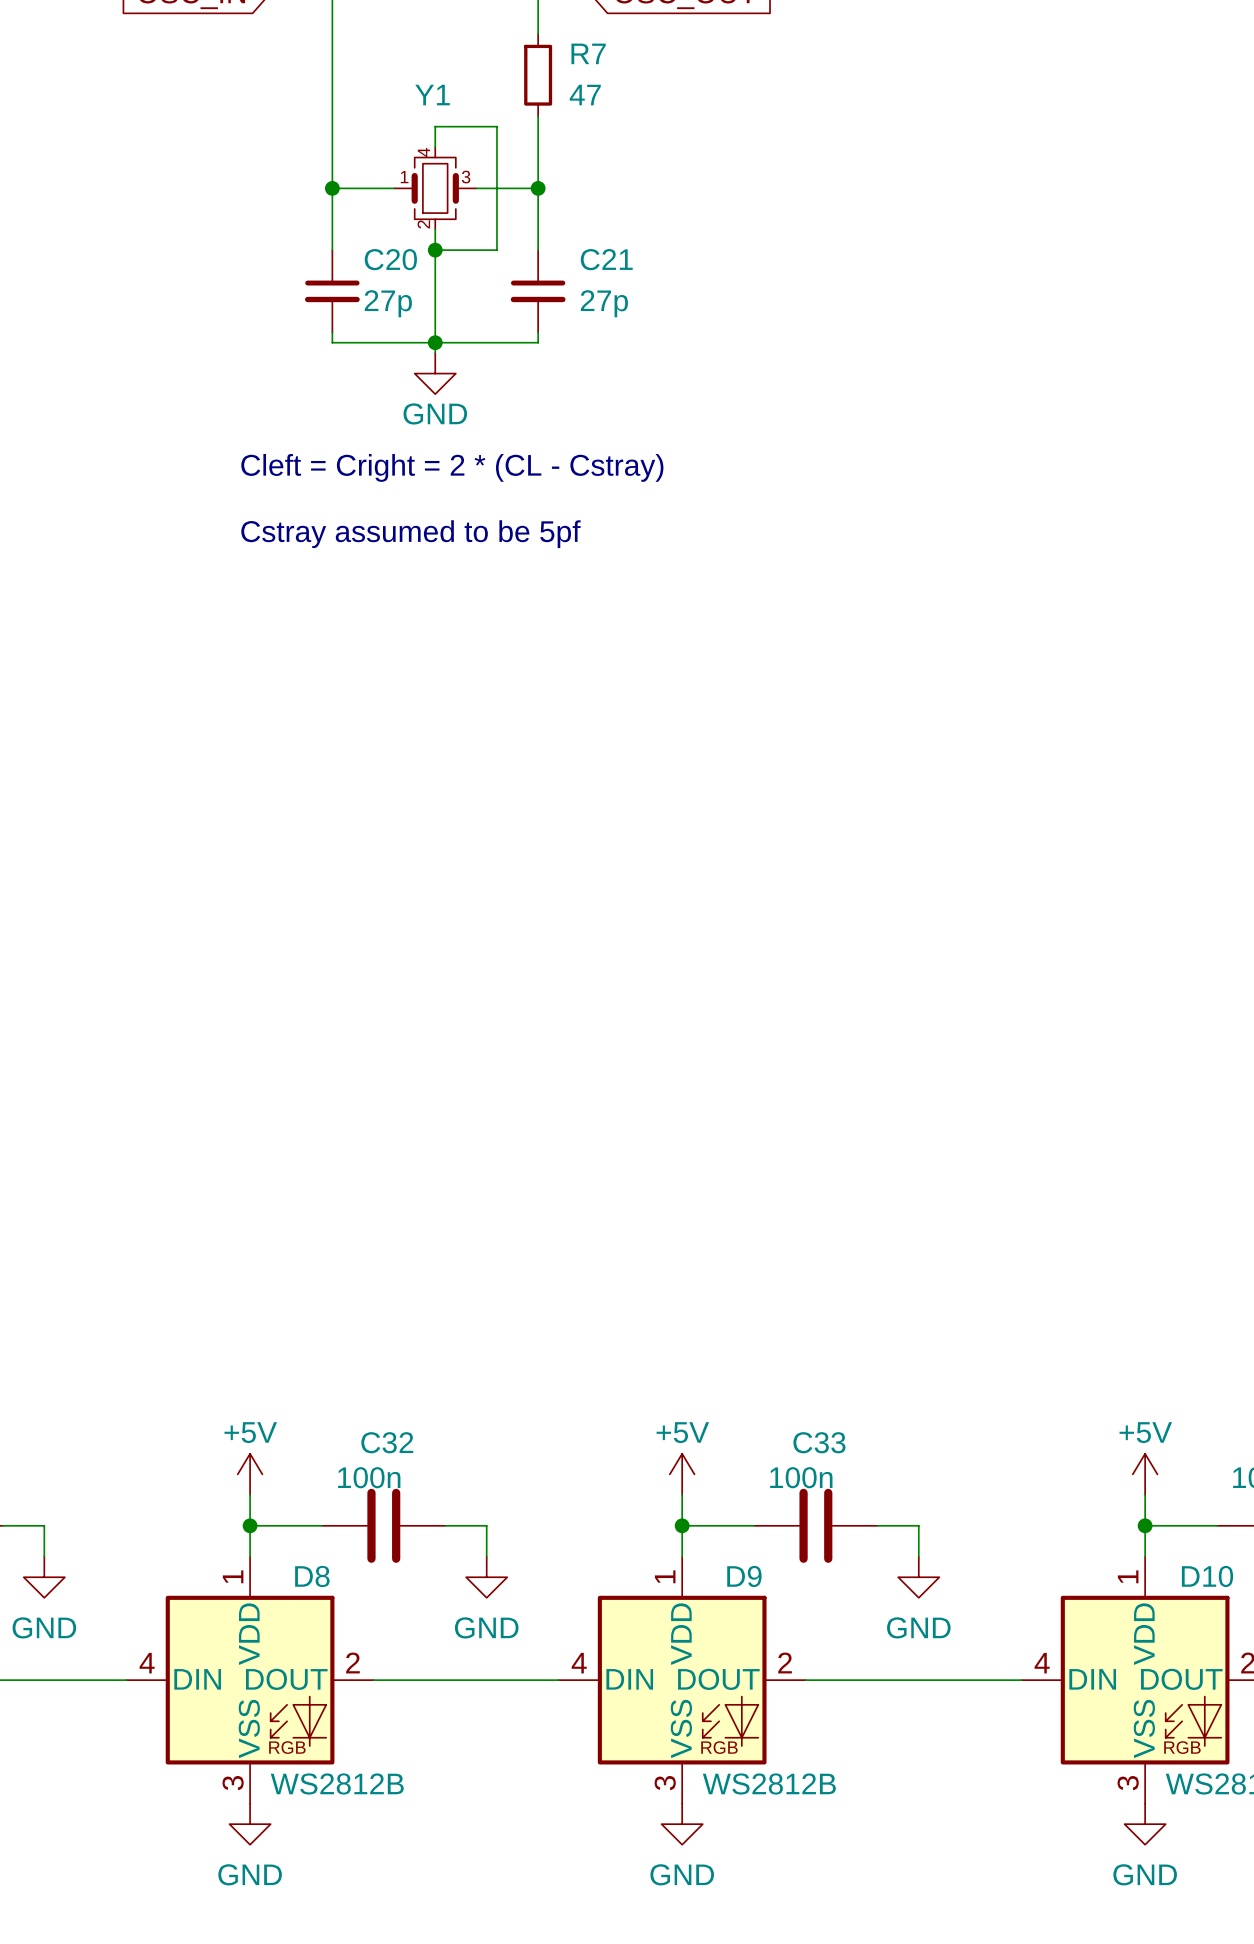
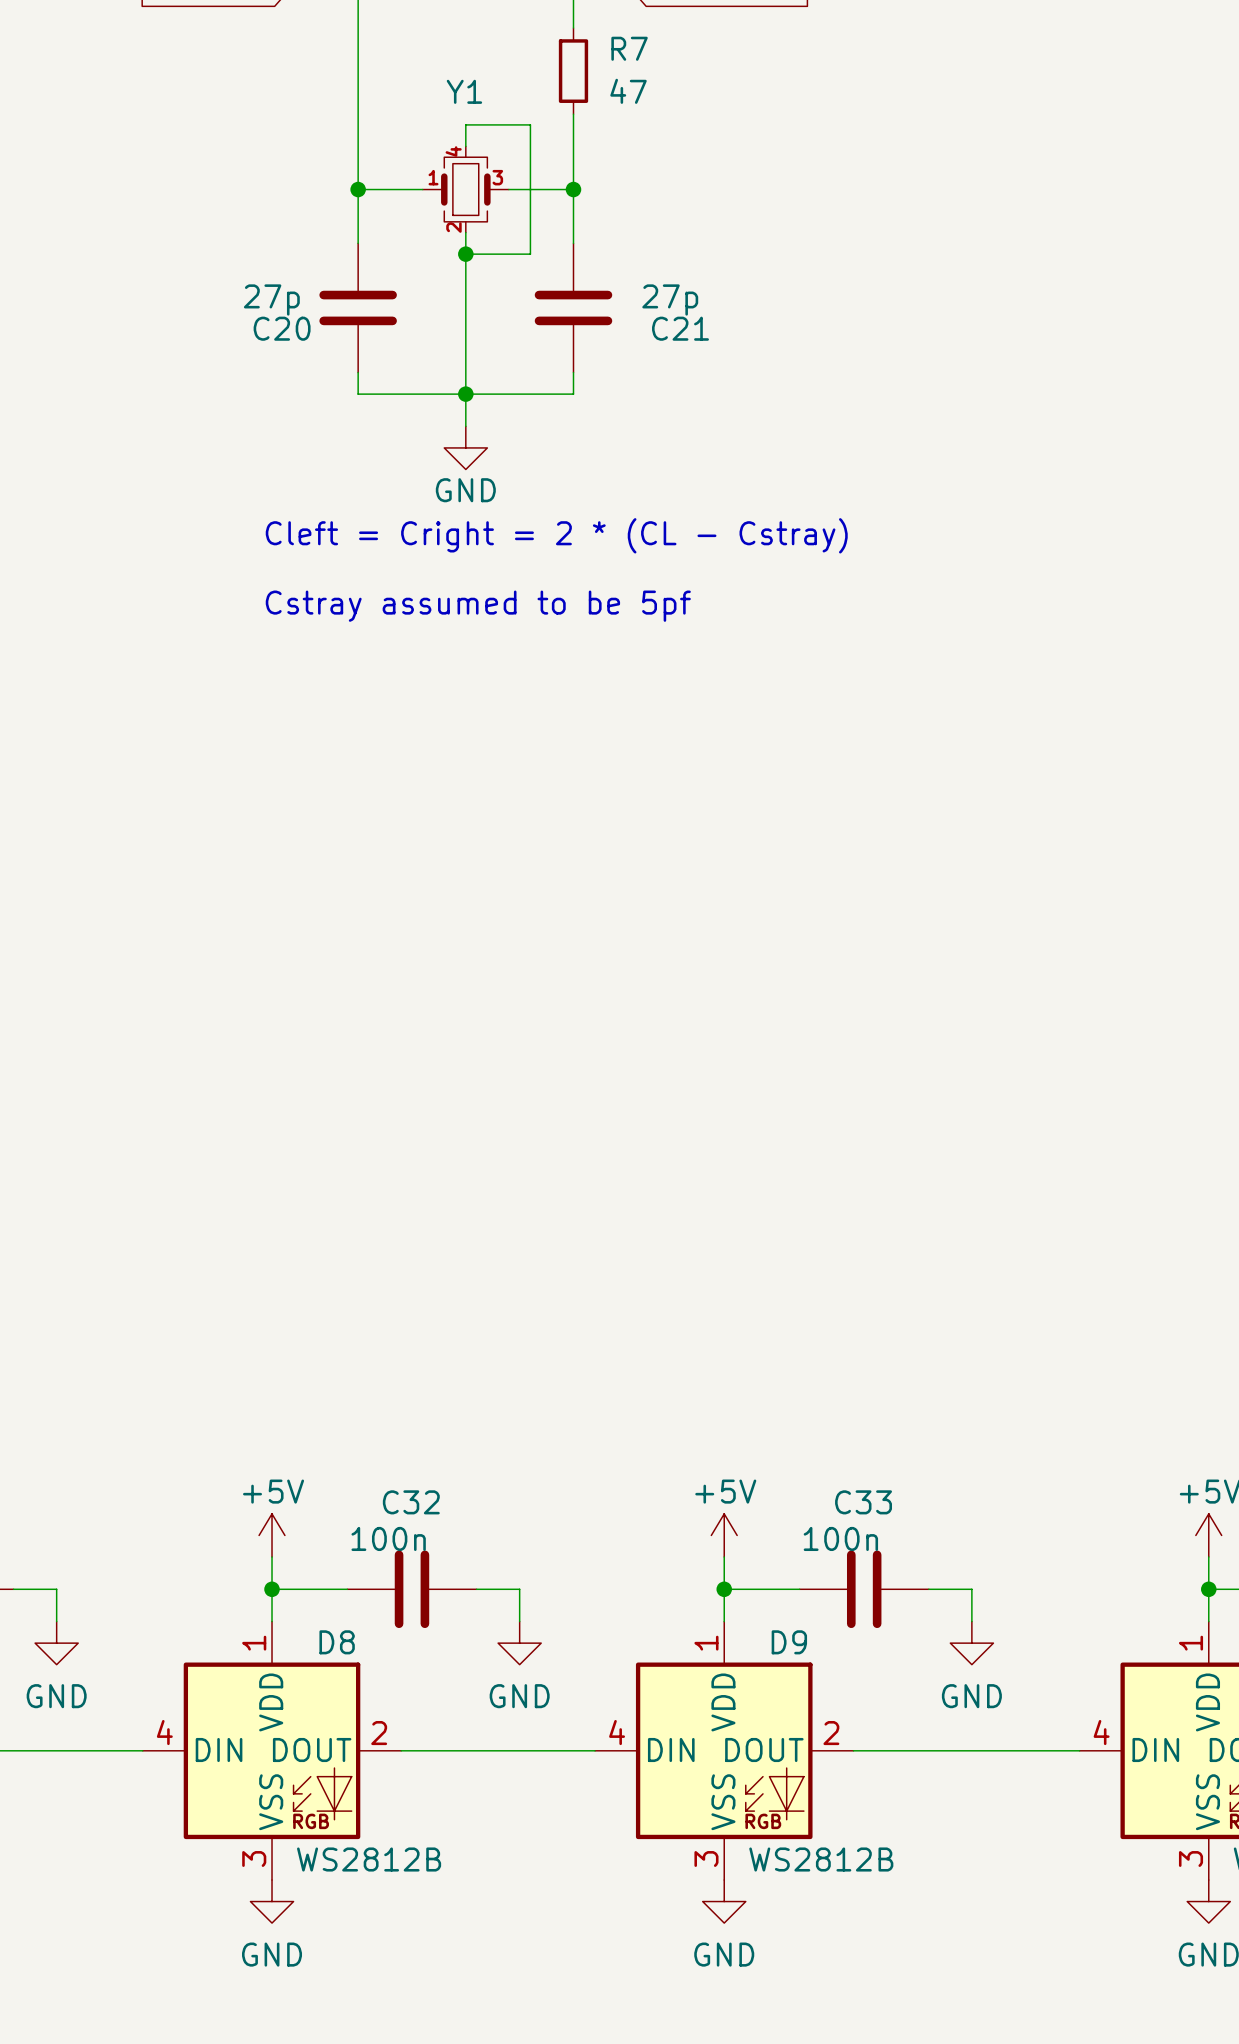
C20 symbol: [305, 250, 360, 333] -> [319, 243, 397, 373]
C21 symbol: [510, 250, 566, 333] -> [534, 243, 613, 373]
C20 name position: C20 (390, 259) -> C20 (282, 328)
C21 name position: C21 (606, 259) -> C21 (680, 328)
C20 value position: 27p (388, 303) -> 27p (271, 299)
wire: (332, 332) (332, 342) (538, 342) (538, 332) -> none
junction position: (435, 342) -> (465, 394)
wire: none -> (465, 361) (465, 426)
wire: none -> (358, 372) (358, 394) (573, 394) (573, 372)
power symbol position: GND (435, 373) -> GND (465, 447)
text position: Cleft = Cright = 2 * (CL - Cstray) (452, 467) -> Cleft = Cright = 2 * (CL - Cstray) (556, 535)
text position: Cstray assumed to be 5pf (410, 534) -> Cstray assumed to be 5pf (478, 606)

